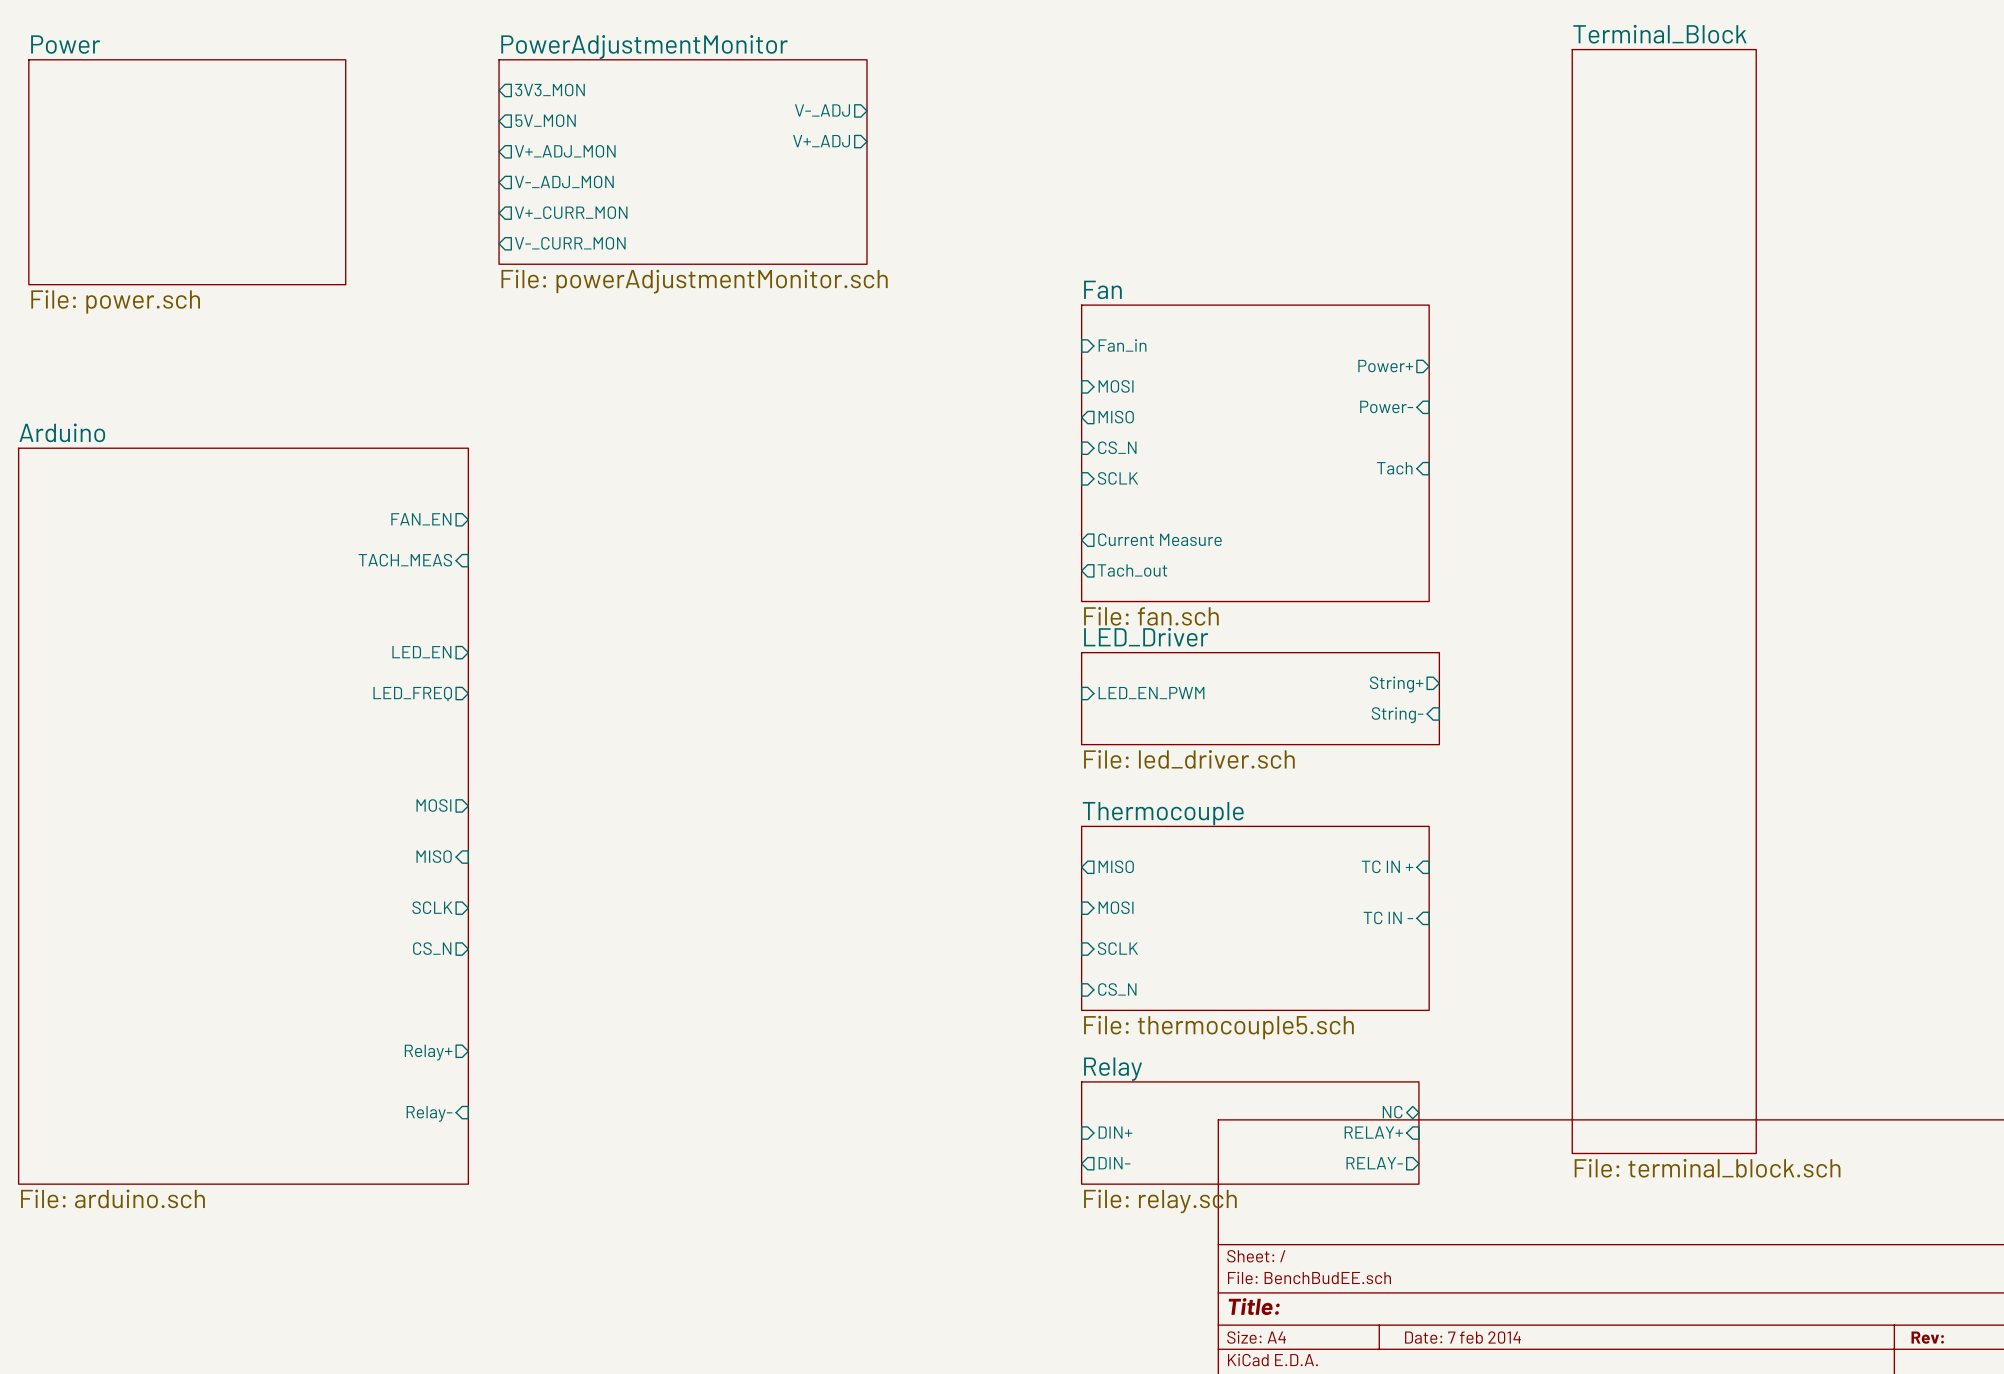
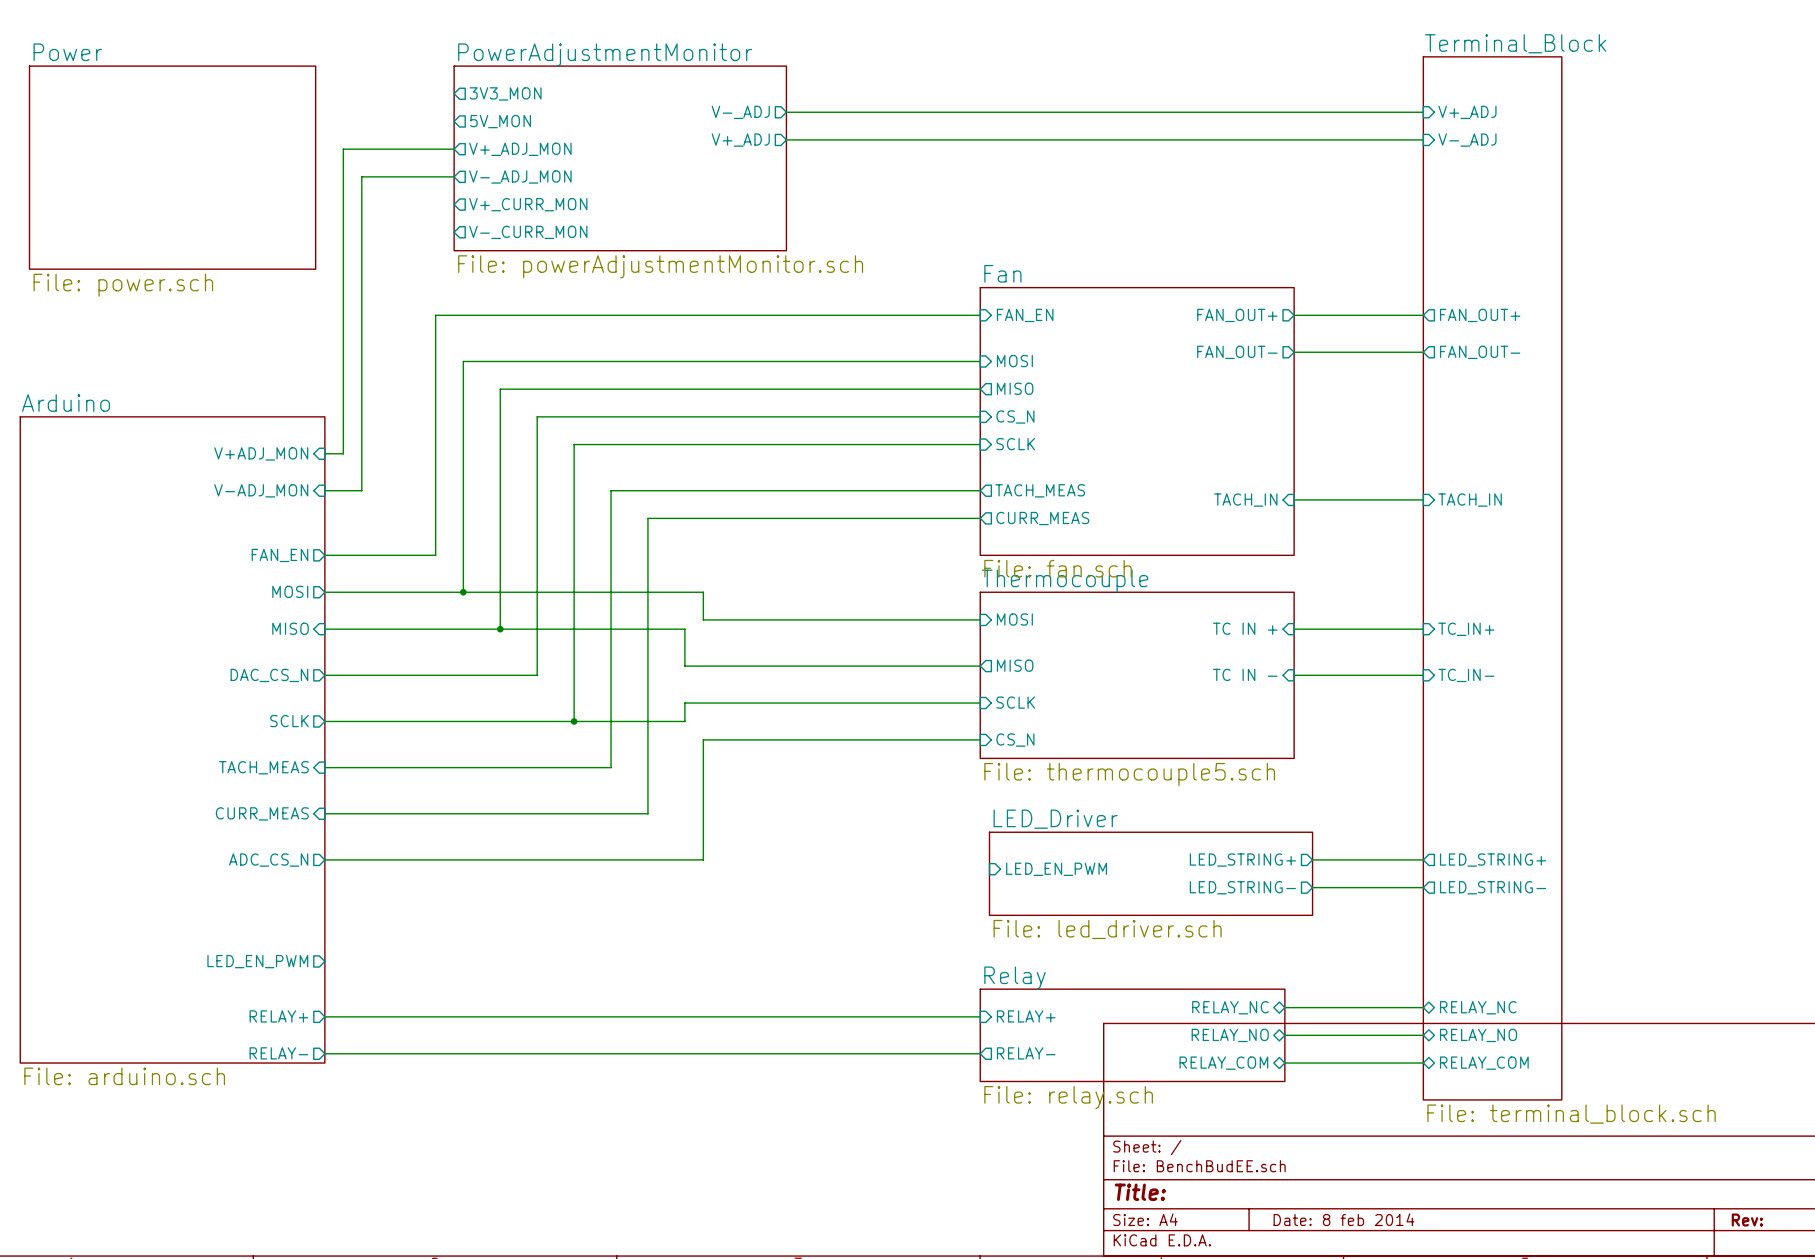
wire: none -> (786, 112) (1423, 112)
sheet pin: none -> V+_ADJ (1467, 112)
wire: none -> (786, 139) (1423, 139)
sheet pin: none -> V-_ADJ (1467, 140)
wire: none -> (454, 149) (343, 149) (343, 453) (324, 453)
wire: none -> (454, 176) (361, 176) (361, 490) (324, 490)
wire: none -> (980, 315) (435, 315) (435, 555) (324, 555)
sheet pin: none -> FAN_EN (1025, 315)
sheet pin: none -> FAN_OUT+ (1237, 315)
wire: none -> (1294, 315) (1423, 315)
sheet pin: none -> FAN_OUT+ (1480, 315)
sheet pin: Fan_in (1122, 345) -> none
sheet pin: Power+ (1385, 366) -> none
sheet pin: none -> FAN_OUT- (1237, 352)
wire: none -> (1294, 352) (1423, 352)
sheet pin: none -> FAN_OUT- (1480, 352)
wire: none -> (980, 361) (463, 361) (463, 592)
sheet pin: Power- (1386, 406) -> none
wire: none -> (980, 389) (500, 389) (500, 629)
wire: none -> (980, 416) (537, 416) (537, 675) (324, 675)
sheet pin: Tach (1394, 468) -> none
wire: none -> (980, 444) (574, 444) (574, 721)
sheet pin: none -> V+ADJ_MON (261, 453)
sheet pin position: FAN_EN (421, 519) -> FAN_EN (279, 555)
sheet pin: none -> V-ADJ_MON (261, 490)
wire: none -> (980, 490) (611, 490) (611, 767) (324, 767)
sheet pin: none -> TACH_MEAS (1040, 490)
sheet pin: Current Measure (1159, 539) -> none
sheet pin: none -> TACH_IN (1245, 500)
sheet pin: none -> TACH_IN (1470, 500)
wire: none -> (1294, 499) (1423, 499)
sheet pin: TACH_MEAS (405, 560) -> none
wire: none -> (980, 518) (647, 518) (647, 813) (324, 813)
sheet pin: none -> CURR_MEAS (1042, 518)
sheet pin: Tach_out (1132, 570) -> none
sheet Terminal_Block: File: terminal_block.sch (1664, 601) -> none
sheet Terminal_Block: none -> File: terminal_block.sch (1492, 578)
wire: none -> (324, 592) (703, 592) (703, 619) (980, 619)
junction: none -> (463, 592)
sheet pin: LED_EN (421, 652) -> none
sheet pin: none -> MOSI (1014, 619)
sheet pin: none -> MISO (290, 628)
sheet pin: none -> TC_IN+ (1466, 629)
wire: none -> (324, 629) (684, 629) (684, 666) (980, 666)
junction: none -> (500, 629)
wire: none -> (1294, 629) (1423, 629)
sheet pin: String+ (1396, 684) -> none
sheet pin: LED_EN_PWM (1151, 693) -> none
sheet pin: LED_FREQ (412, 694) -> none
sheet LED_Driver: File: led_driver.sch (1260, 698) -> none
sheet pin: String- (1397, 715) -> none
sheet pin: none -> DAC_CS_N (269, 675)
sheet pin: none -> TC_IN- (1466, 675)
wire: none -> (1294, 675) (1423, 675)
wire: none -> (980, 703) (684, 703) (684, 721) (324, 721)
junction: none -> (574, 721)
sheet Arduino: none -> File: arduino.sch (172, 739)
sheet pin position: MOSI (433, 805) -> MOSI (290, 591)
wire: none -> (980, 739) (703, 739) (703, 859) (324, 859)
sheet Arduino: File: arduino.sch (243, 816) -> none
sheet pin: none -> TACH_MEAS (263, 767)
sheet pin: MISO (434, 856) -> none
sheet pin position: MISO (1116, 866) -> MISO (1015, 665)
sheet pin position: TC IN + (1387, 866) -> TC IN + (1245, 628)
sheet pin: none -> CURR_MEAS (262, 813)
sheet pin position: SCLK (432, 907) -> SCLK (289, 721)
sheet pin: MOSI (1116, 907) -> none
sheet pin position: TC IN - (1388, 917) -> TC IN - (1245, 674)
sheet Thermocouple position: (1255, 918) -> (1137, 675)
sheet pin: none -> ADC_CS_N (268, 860)
sheet pin: none -> LED_STRING+ (1242, 860)
wire: none -> (1312, 859) (1423, 859)
sheet pin: none -> LED_STRING+ (1493, 860)
sheet pin: CS_N (432, 948) -> none
sheet pin position: SCLK (1117, 948) -> SCLK (1015, 702)
sheet pin: none -> LED_EN_PWM (1056, 869)
sheet LED_Driver: none -> File: led_driver.sch (1151, 873)
sheet pin: none -> LED_STRING- (1242, 887)
wire: none -> (1312, 887) (1423, 887)
sheet pin: none -> LED_STRING- (1493, 887)
sheet pin position: CS_N (1117, 989) -> CS_N (1015, 740)
sheet pin: none -> LED_EN_PWM (257, 961)
sheet pin: Relay+ (428, 1052) -> none
sheet pin: none -> RELAY_NC (1230, 1007)
sheet pin: none -> RELAY_NC (1478, 1007)
wire: none -> (1284, 1007) (1423, 1007)
sheet pin: none -> RELAY+ (278, 1016)
wire: none -> (324, 1016) (980, 1016)
sheet pin: none -> RELAY+ (1026, 1016)
sheet pin: NC (1392, 1112) -> none
sheet pin: Relay- (429, 1113) -> none
sheet pin: DIN+ (1115, 1132) -> none
sheet pin shape: input (1373, 1132) -> bidirectional (1230, 1035)
sheet pin: RELAY+ (1373, 1132) -> RELAY_NO (1230, 1035)
sheet pin: none -> RELAY_NO (1478, 1035)
wire: none -> (1284, 1035) (1423, 1035)
sheet pin: none -> RELAY- (278, 1053)
wire: none -> (324, 1053) (980, 1053)
sheet pin: none -> RELAY- (1026, 1053)
sheet pin: DIN- (1114, 1163) -> none
sheet pin shape: output (1374, 1163) -> bidirectional (1223, 1063)
sheet pin: RELAY- (1374, 1163) -> RELAY_COM (1223, 1063)
wire: none -> (1284, 1063) (1423, 1063)
sheet pin: none -> RELAY_COM (1484, 1063)
title block: Date: 7 feb 2014 (1462, 1337) -> Date: 8 feb 2014 (1344, 1219)

